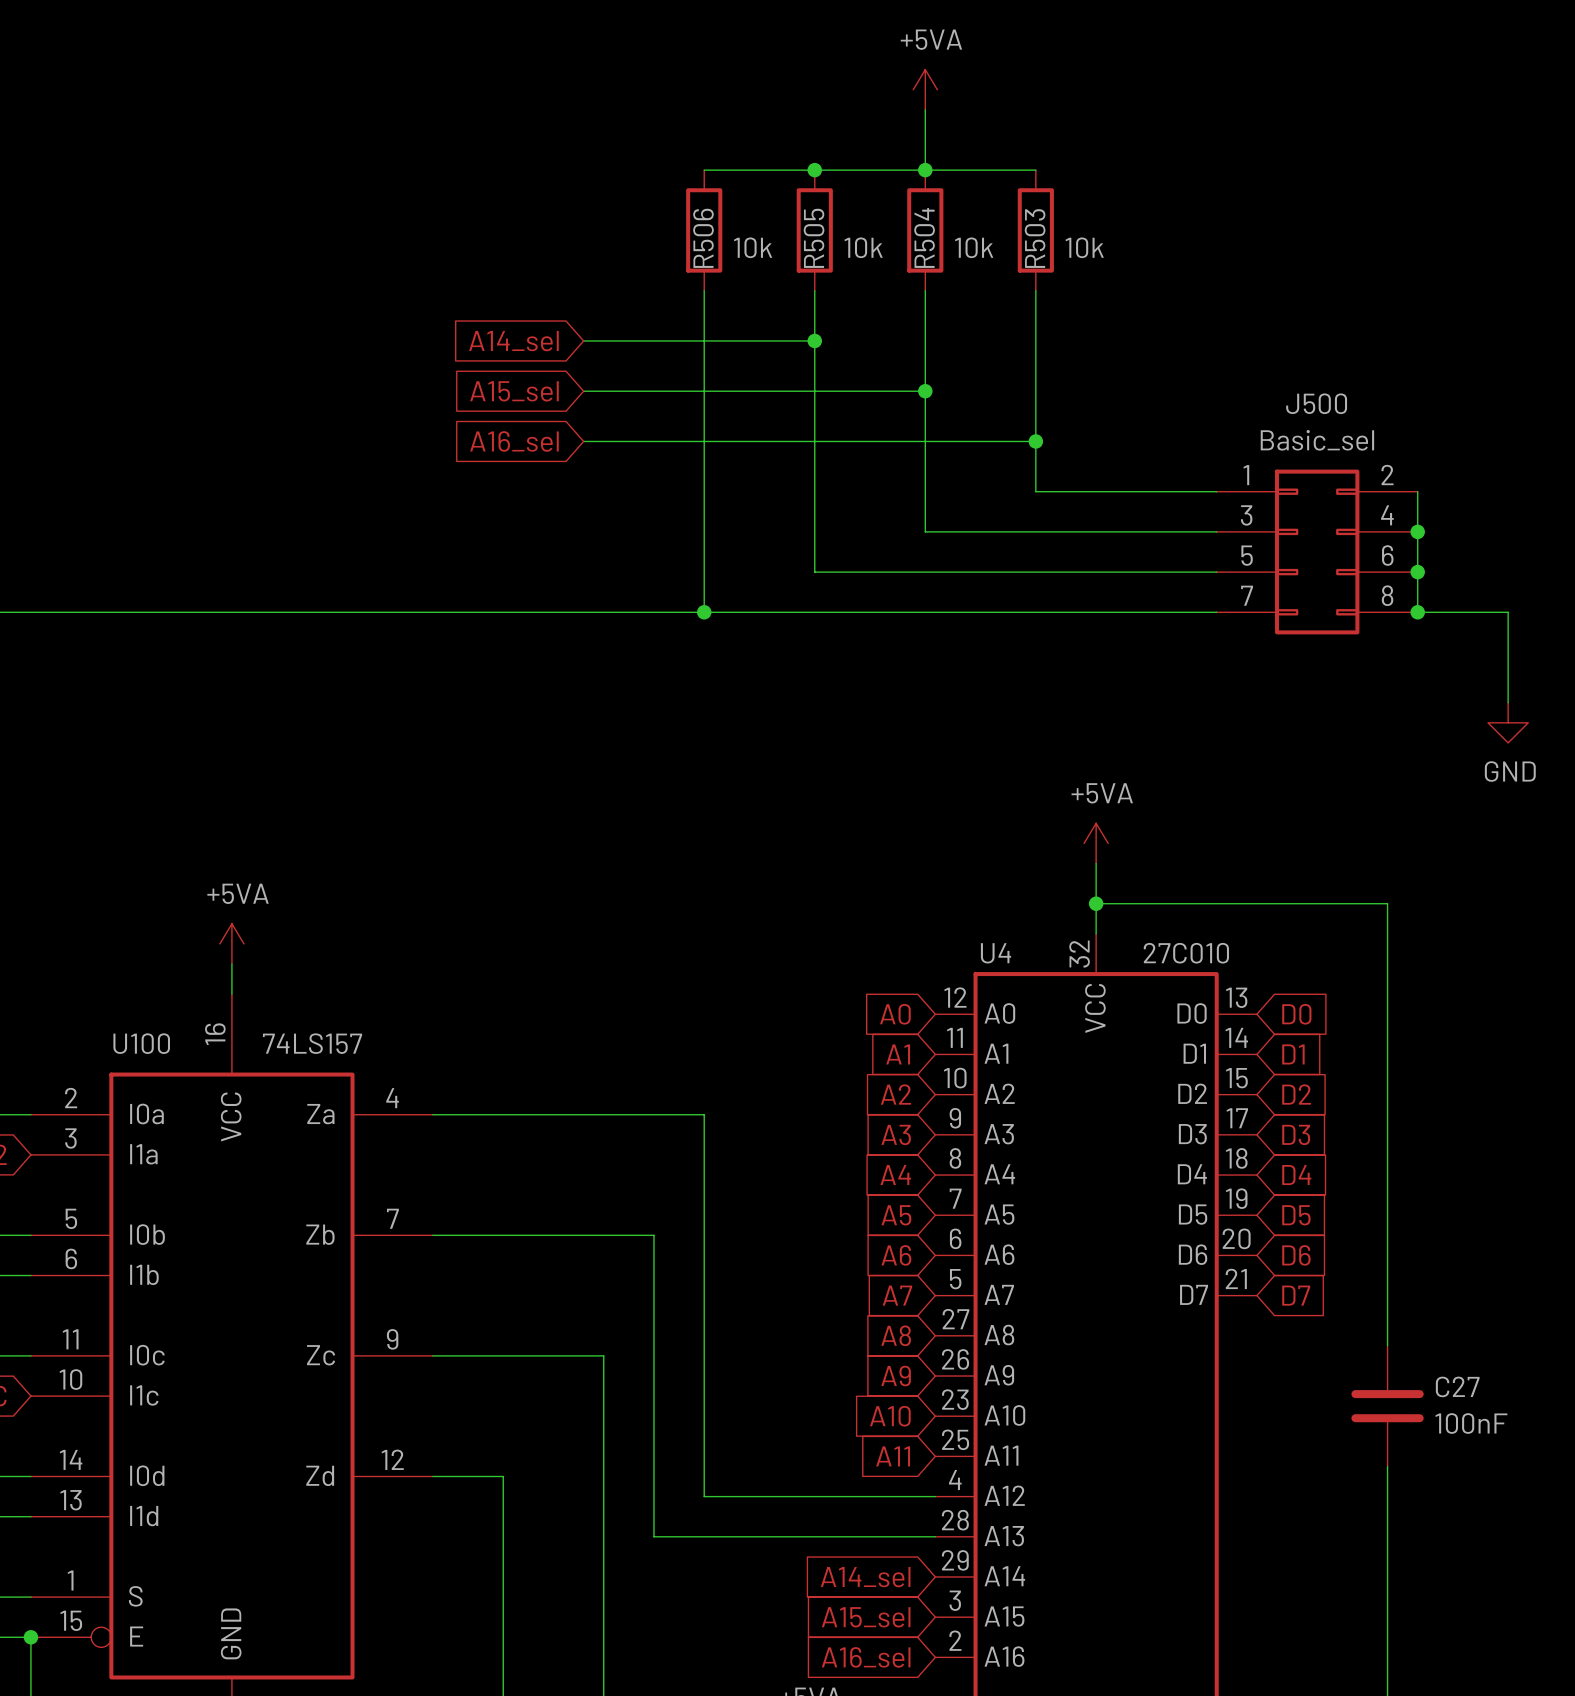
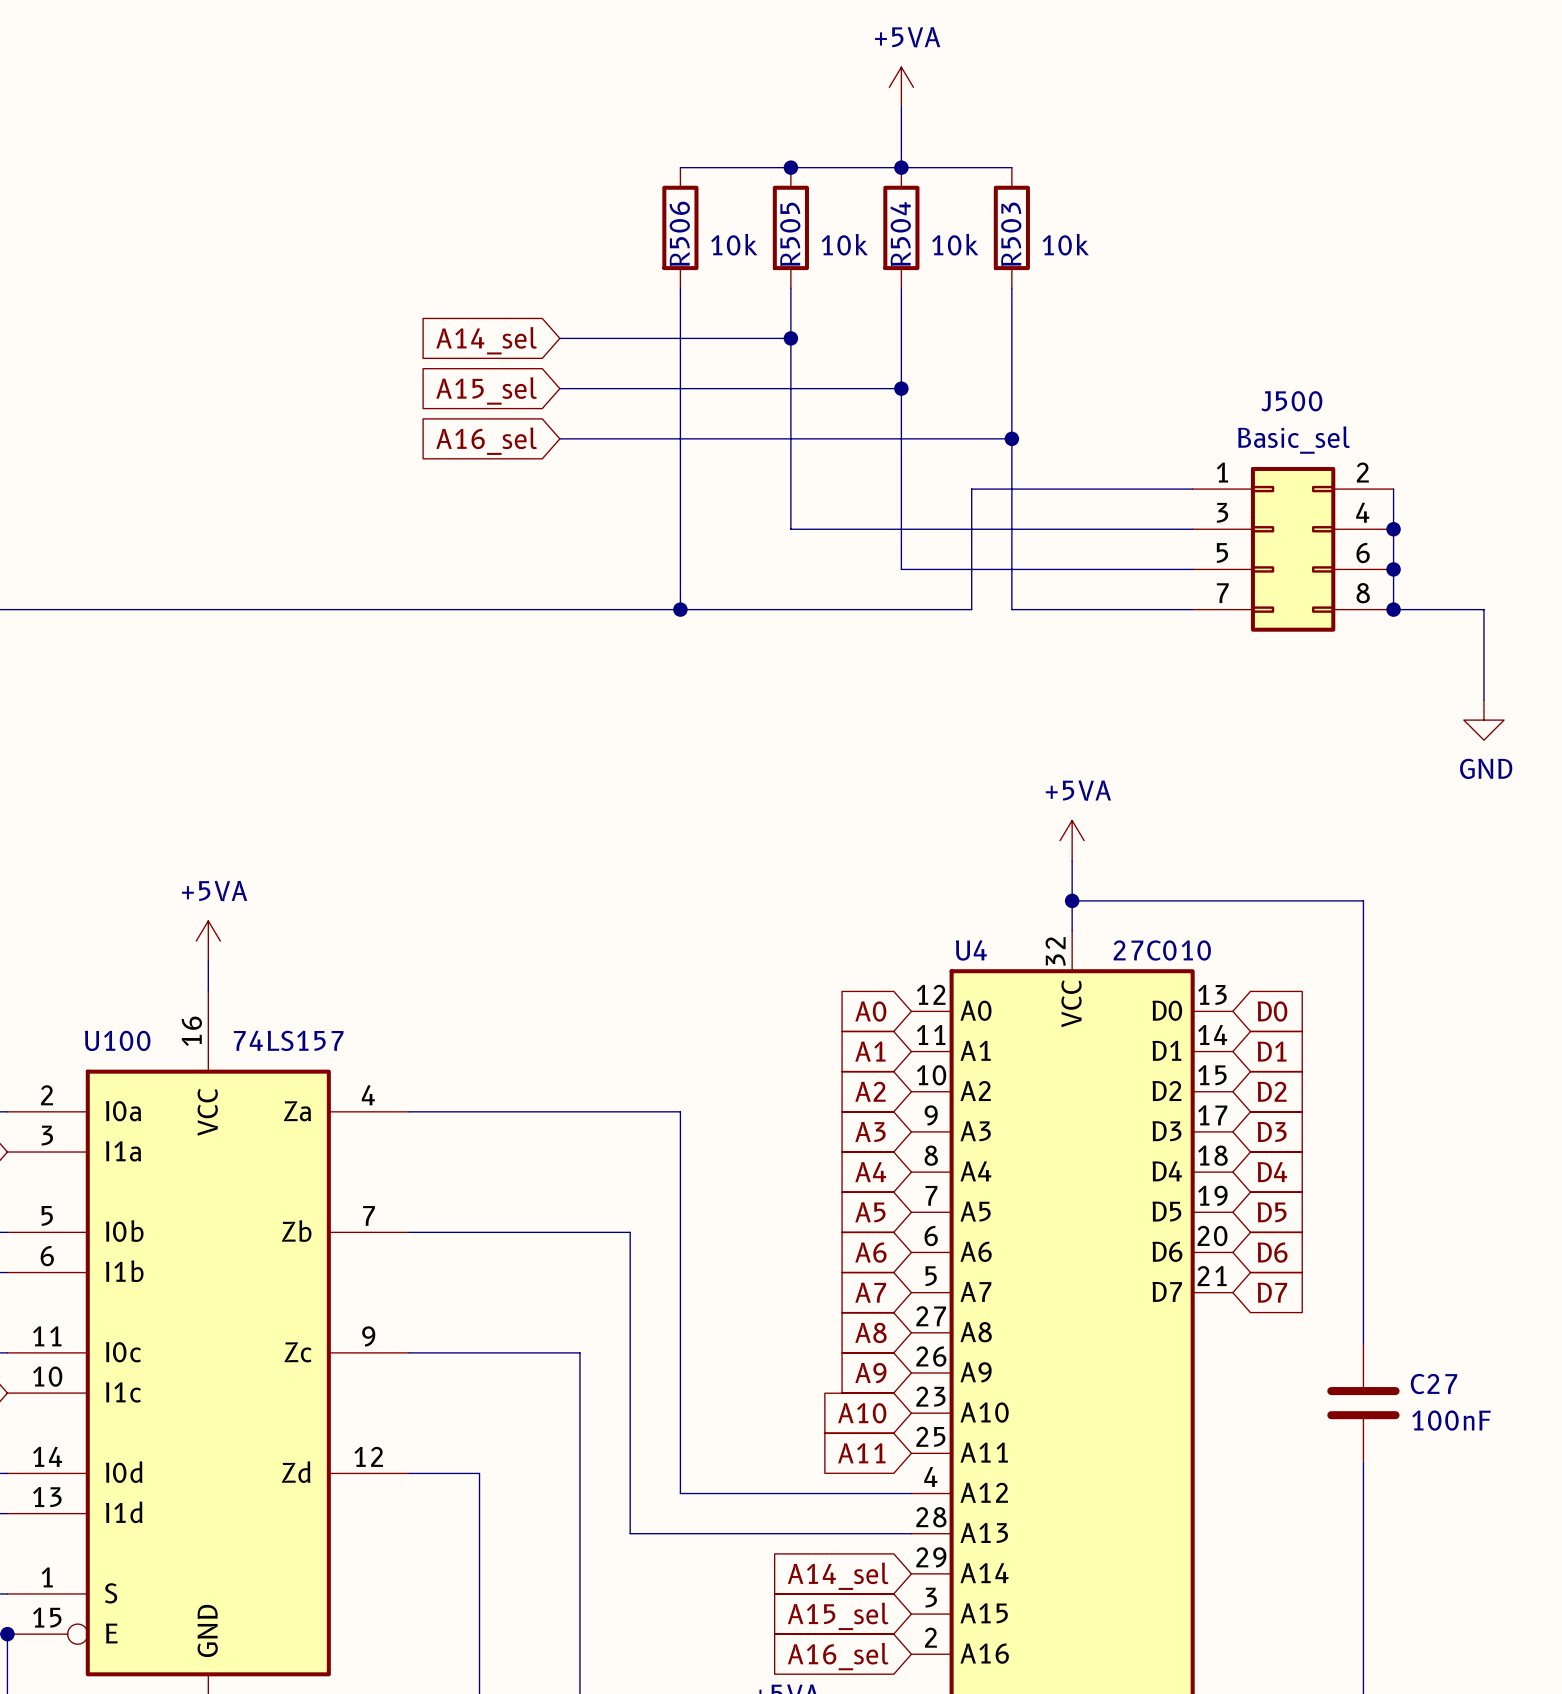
wire: (814, 531) (814, 572) (925, 572) -> (790, 529) (901, 529) (901, 569)
wire: (995, 612) (1035, 612) -> (971, 609) (971, 489) (1011, 489) (1011, 609)

